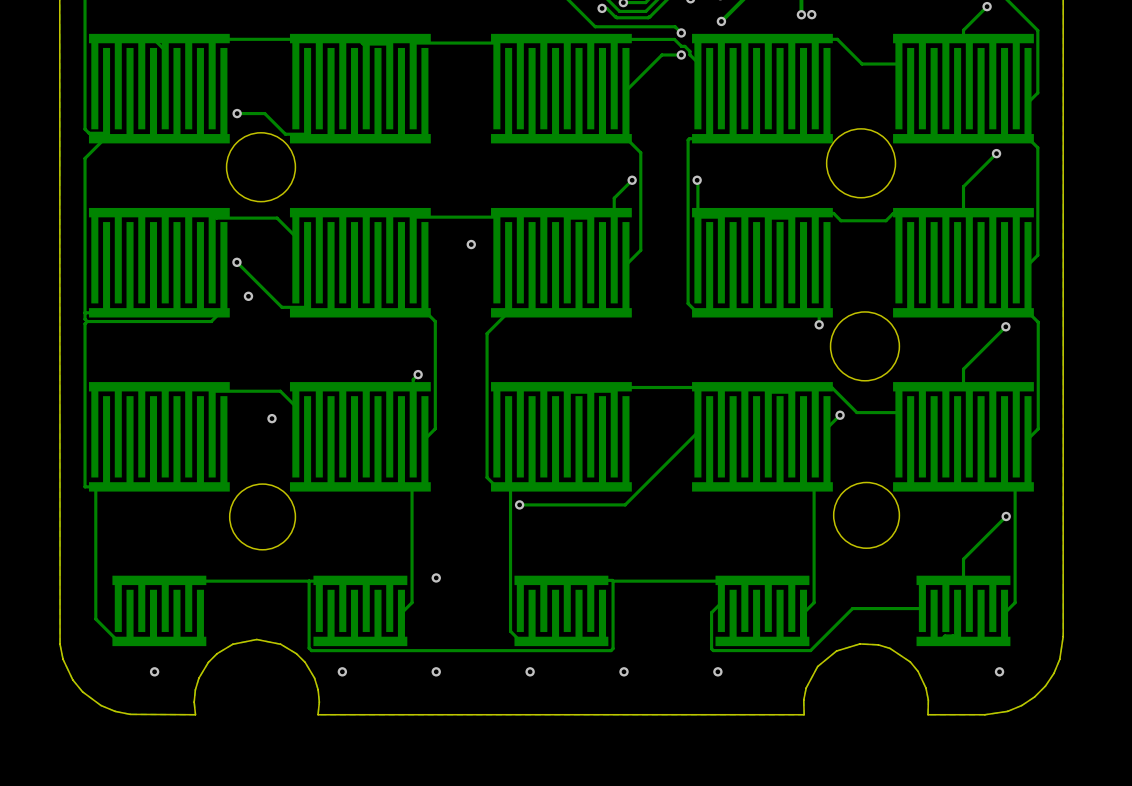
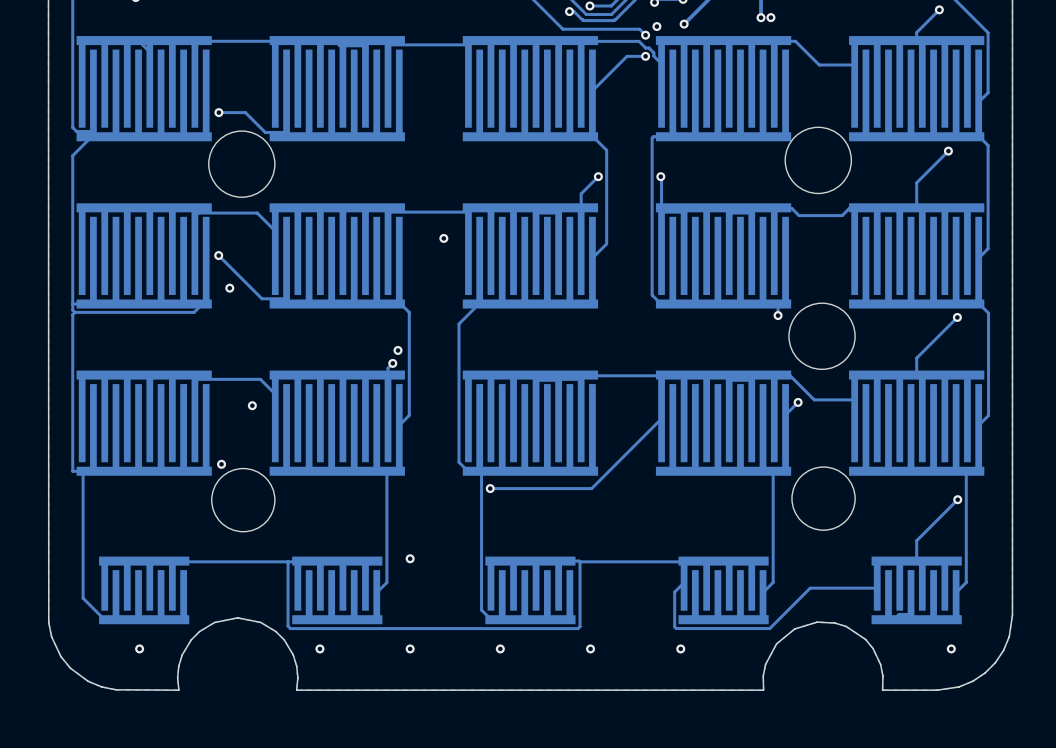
via: none -> (656, 26)
via: none -> (398, 350)
via: none -> (221, 464)

